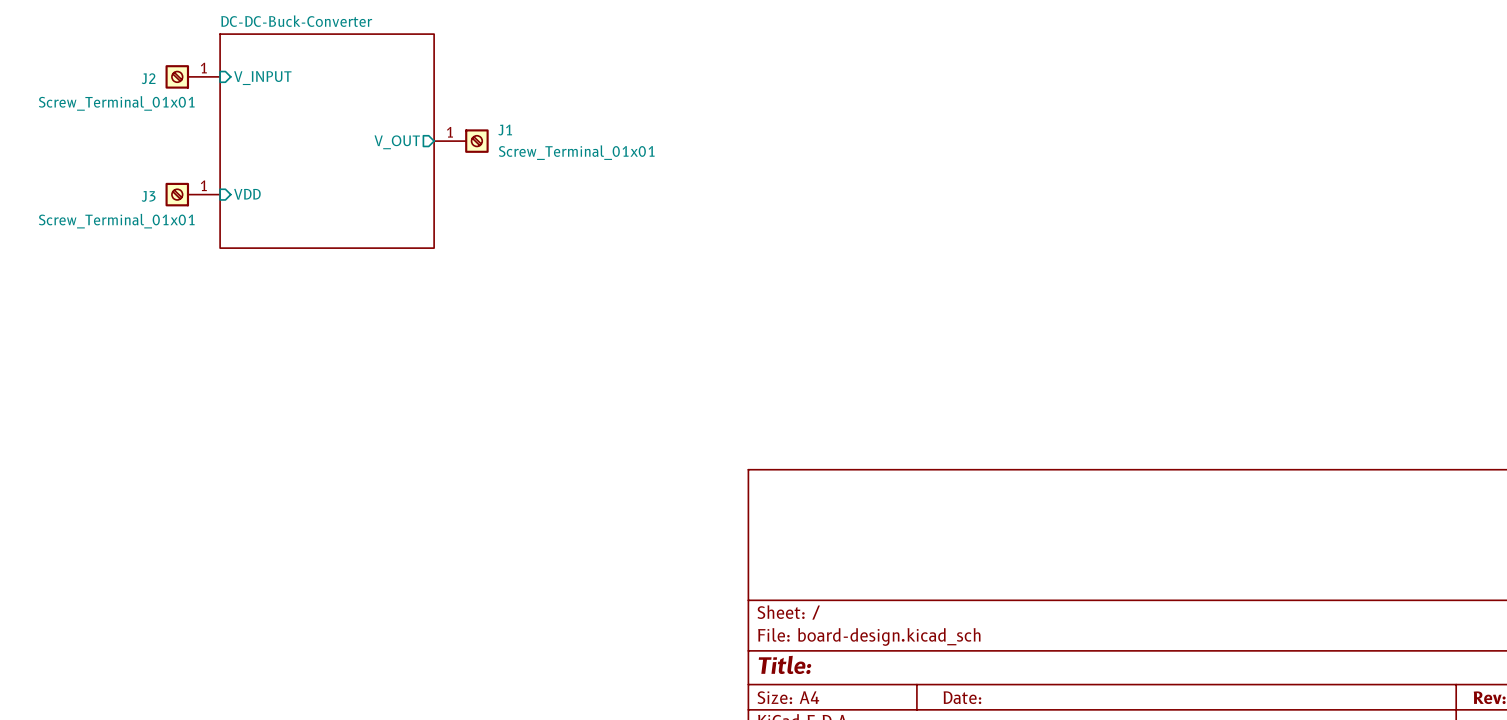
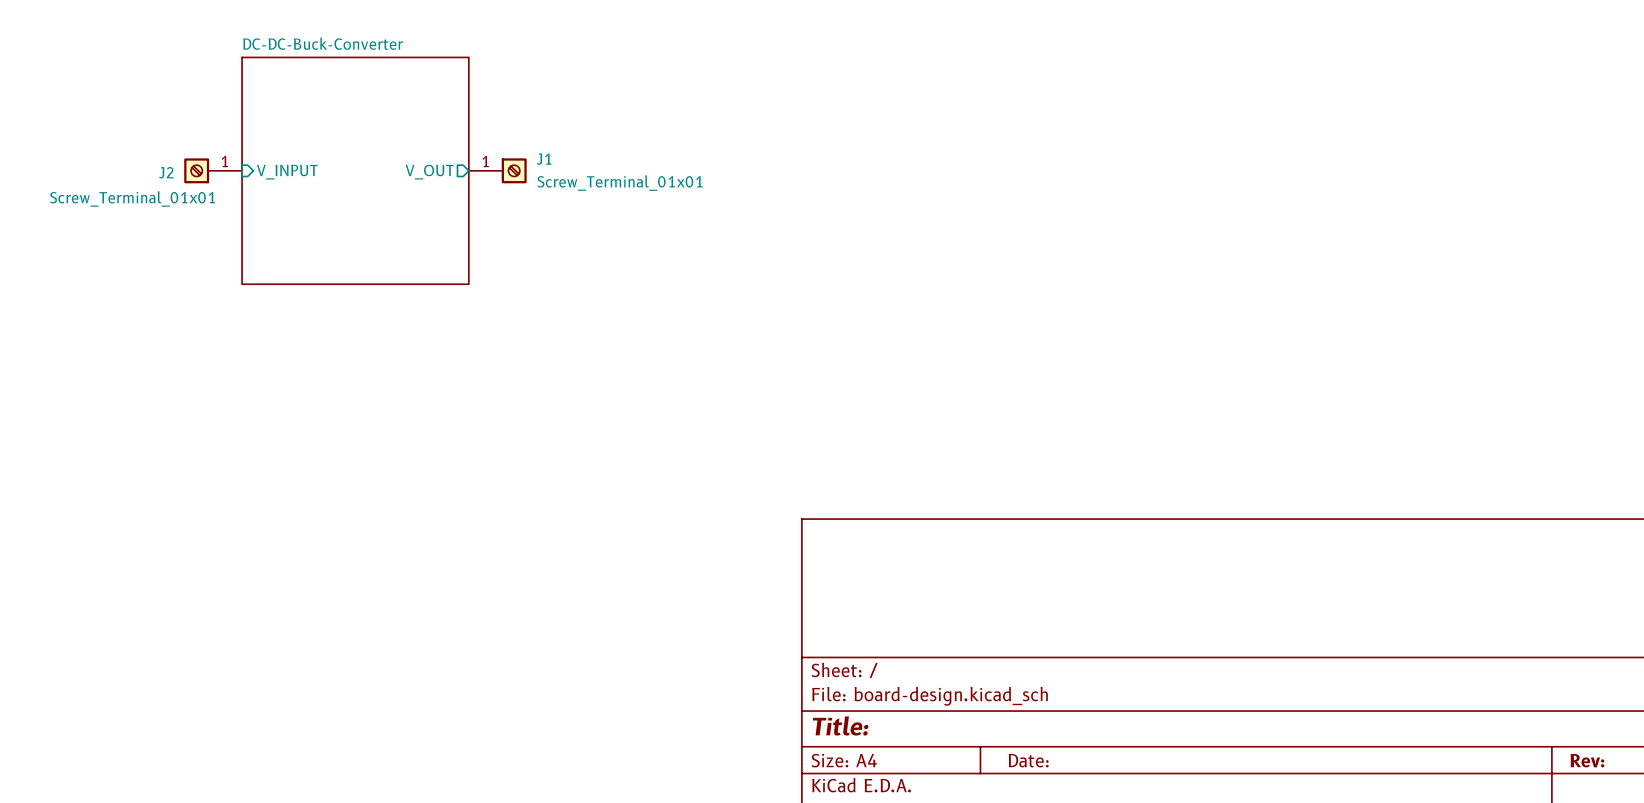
J2 position: (192, 76) -> (213, 170)
sheet pin position: V_INPUT (262, 78) -> V_INPUT (287, 172)
J3: Screw_Terminal_01x01 (192, 194) -> none
sheet pin: VDD (247, 194) -> none

